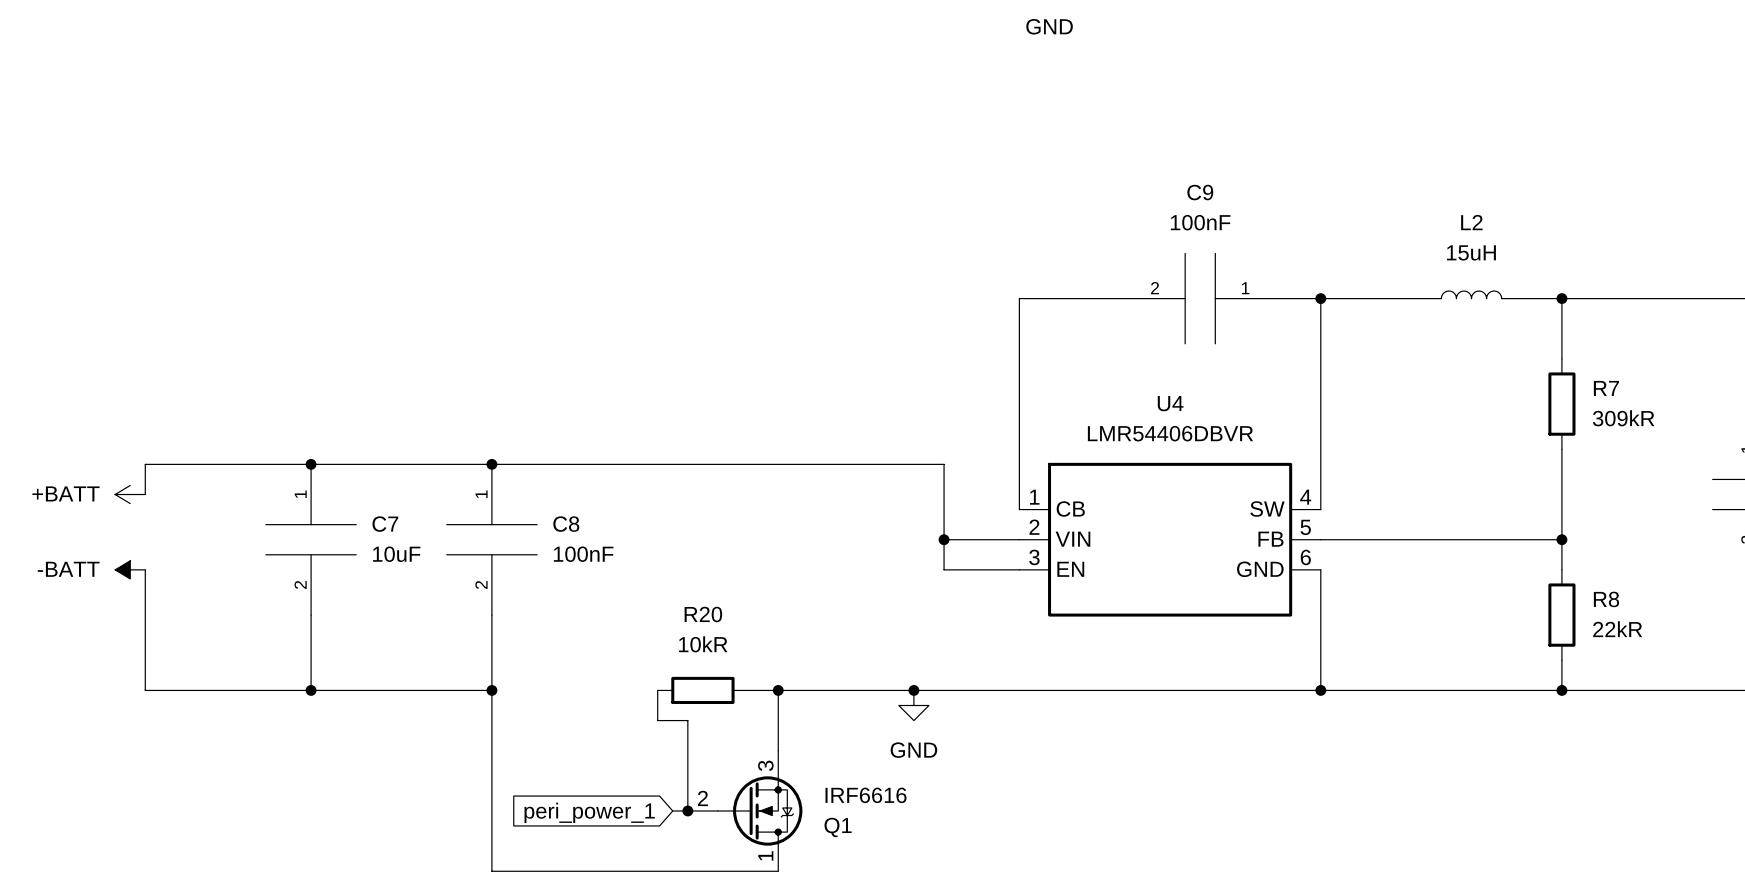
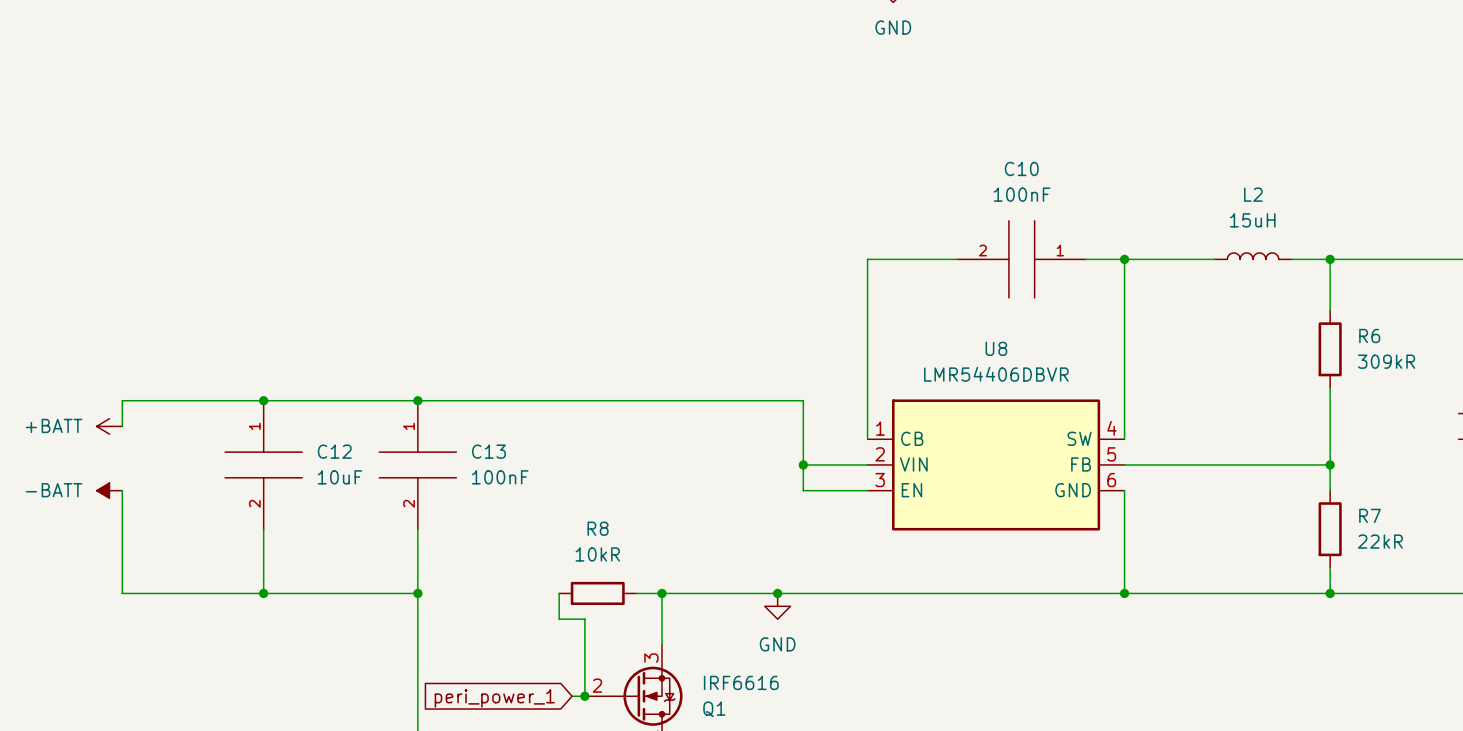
C9 name: C9 (1200, 192) -> C10 (1021, 168)
R7 name: R7 (1606, 388) -> R6 (1369, 335)
U4 name: U4 (1170, 403) -> U8 (996, 348)
C7 name: C7 (385, 524) -> C12 (334, 451)
C8 name: C8 (566, 524) -> C13 (488, 451)
R8 name: R8 (1606, 599) -> R7 (1370, 515)
R20 name: R20 (703, 614) -> R8 (598, 528)

